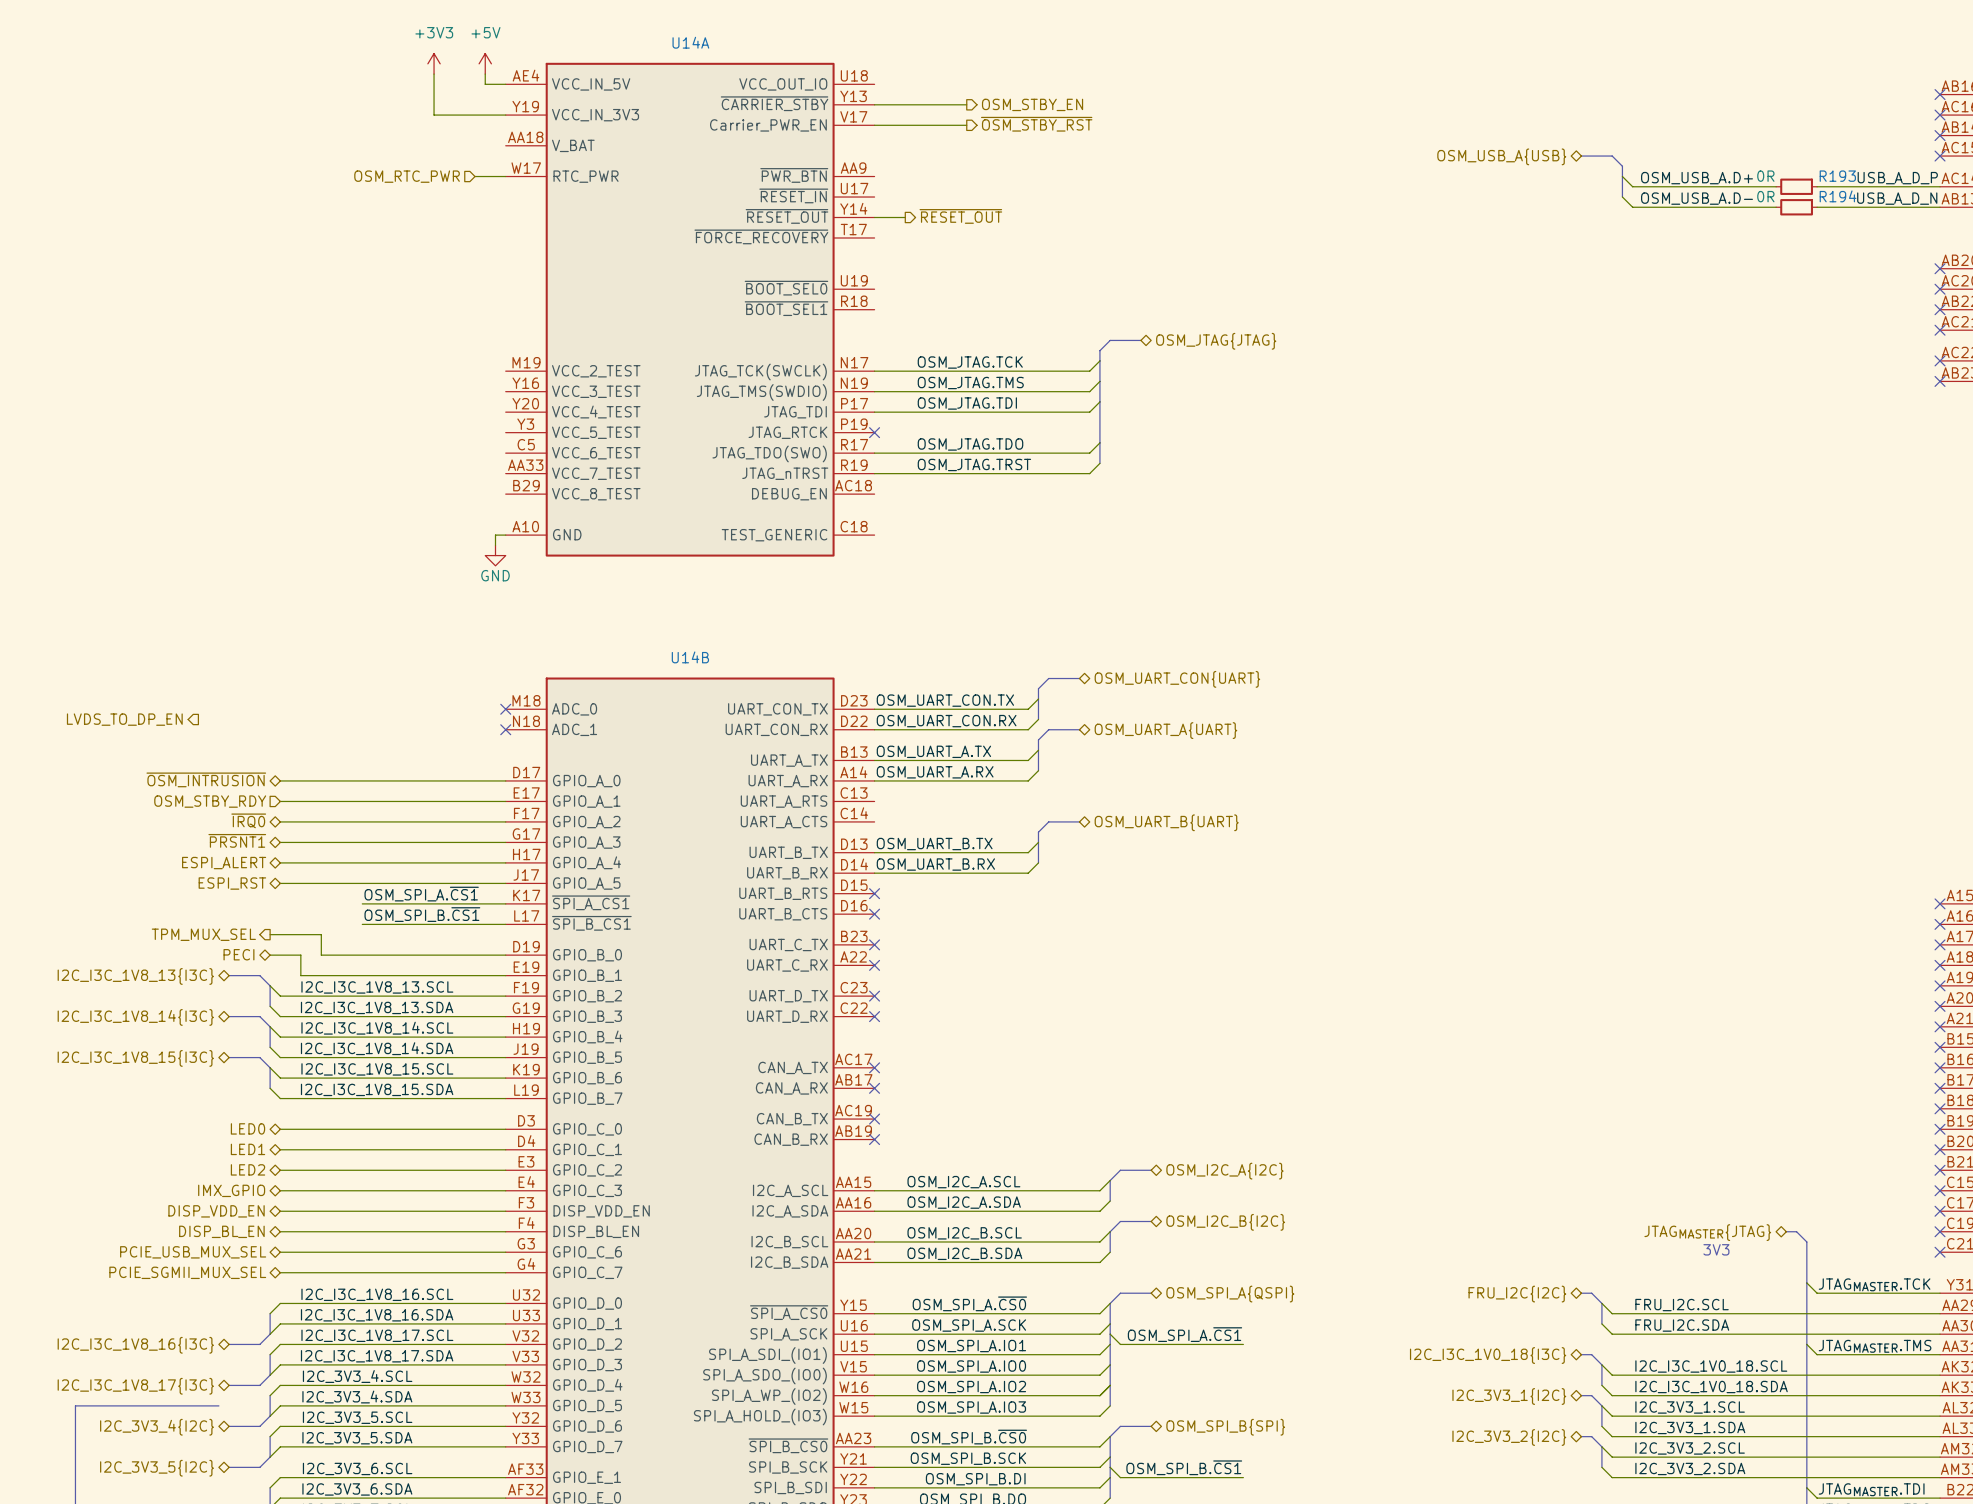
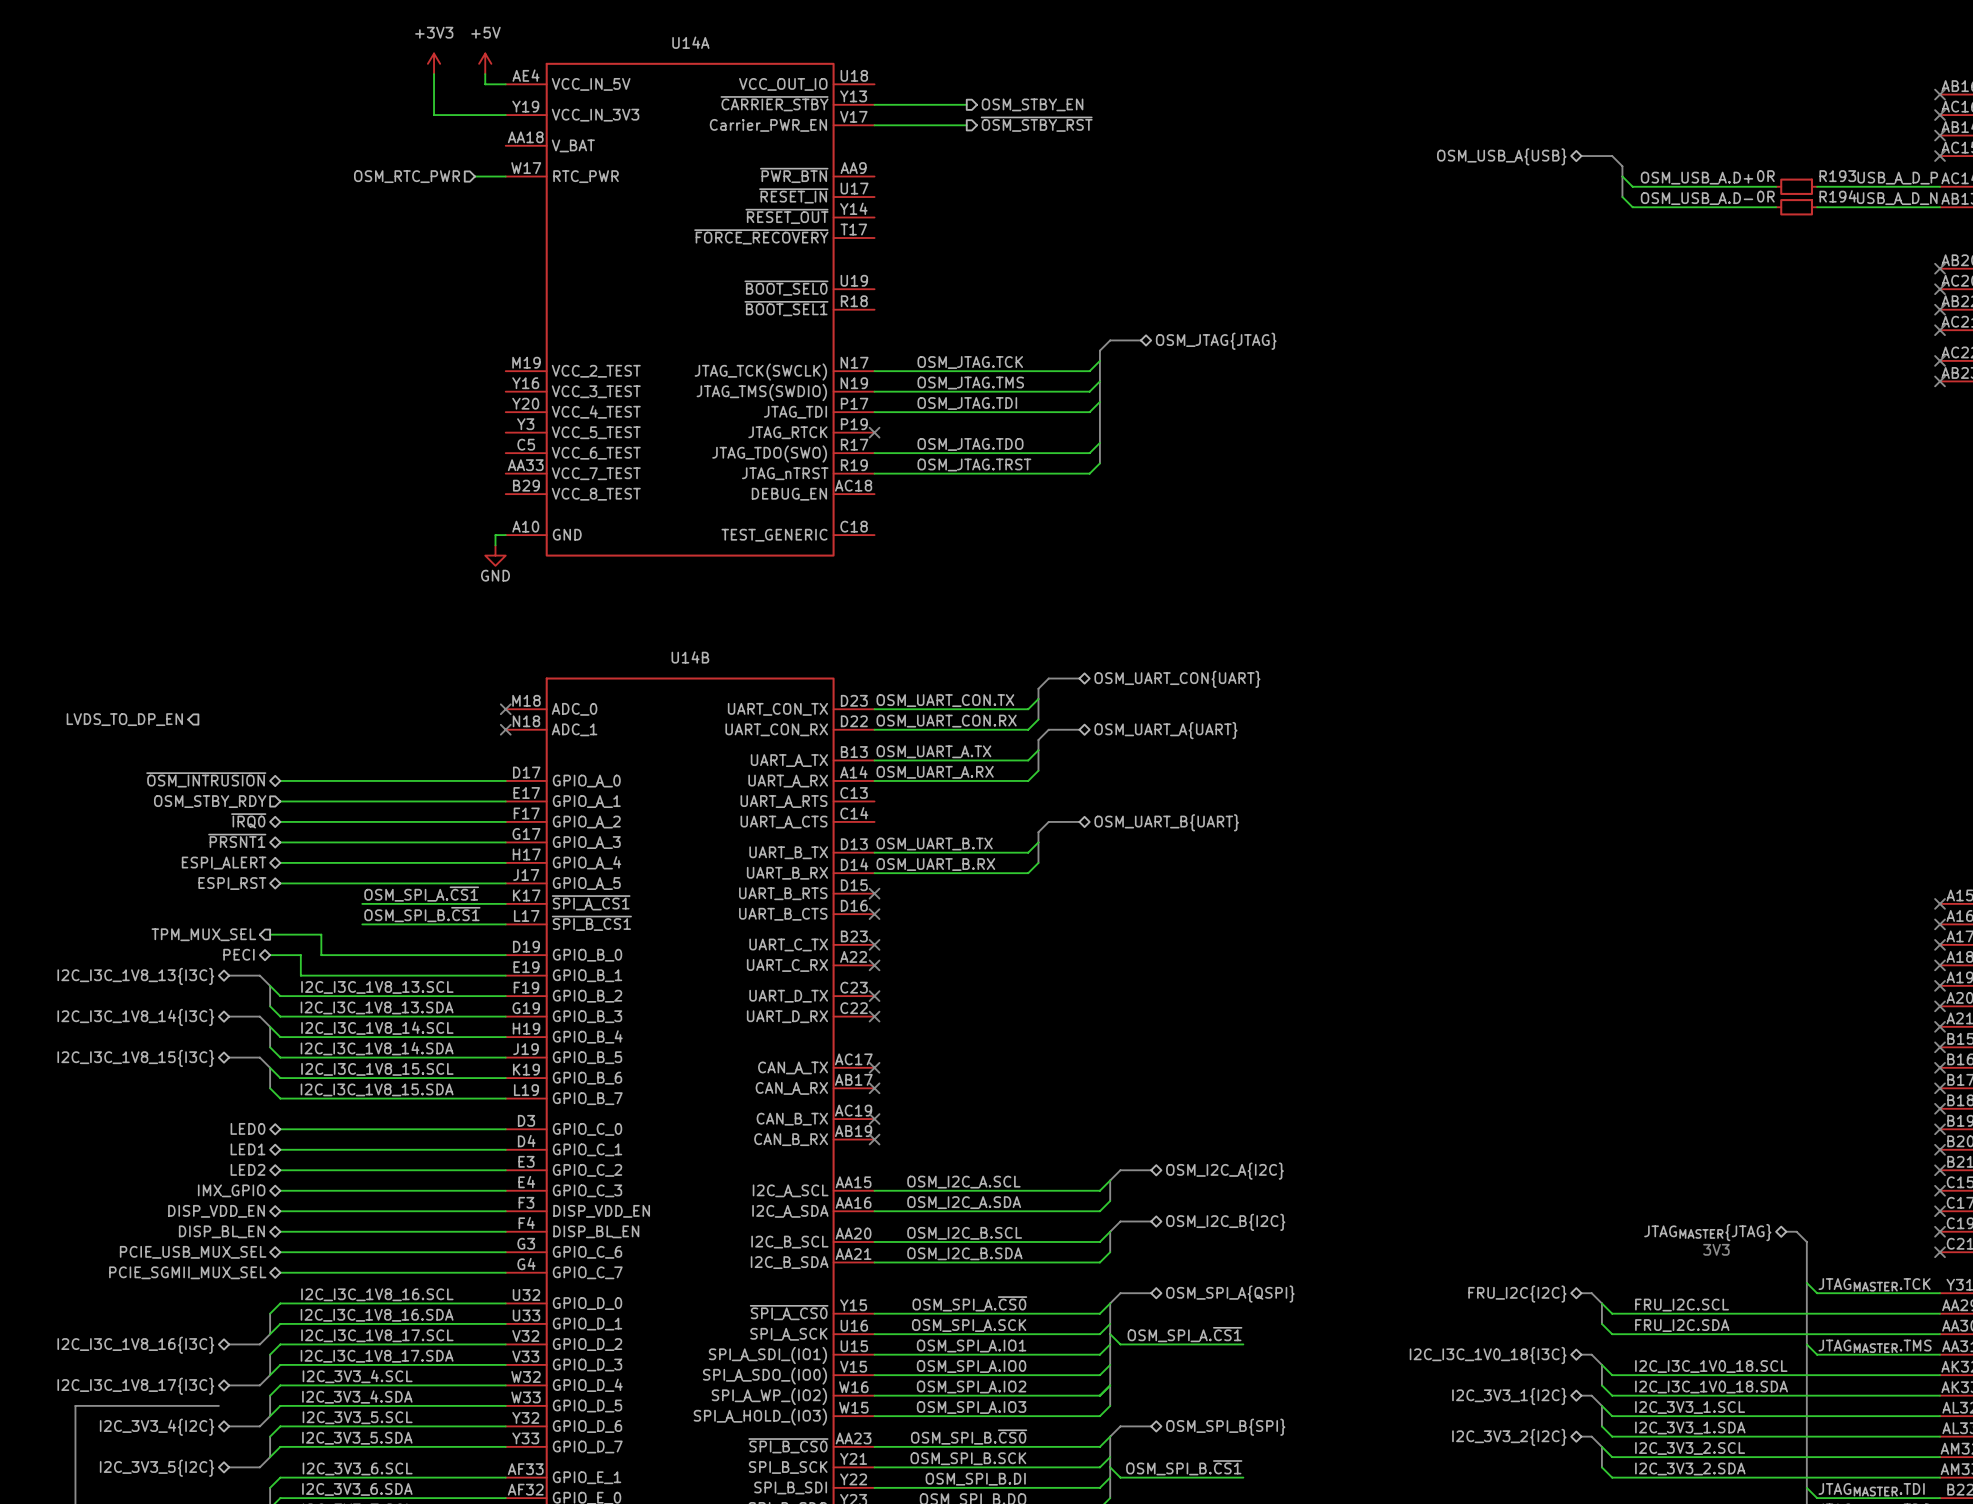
hierarchical label: ~{RESET_OUT} (960, 216) -> none
wire: (874, 217) (905, 217) -> none

